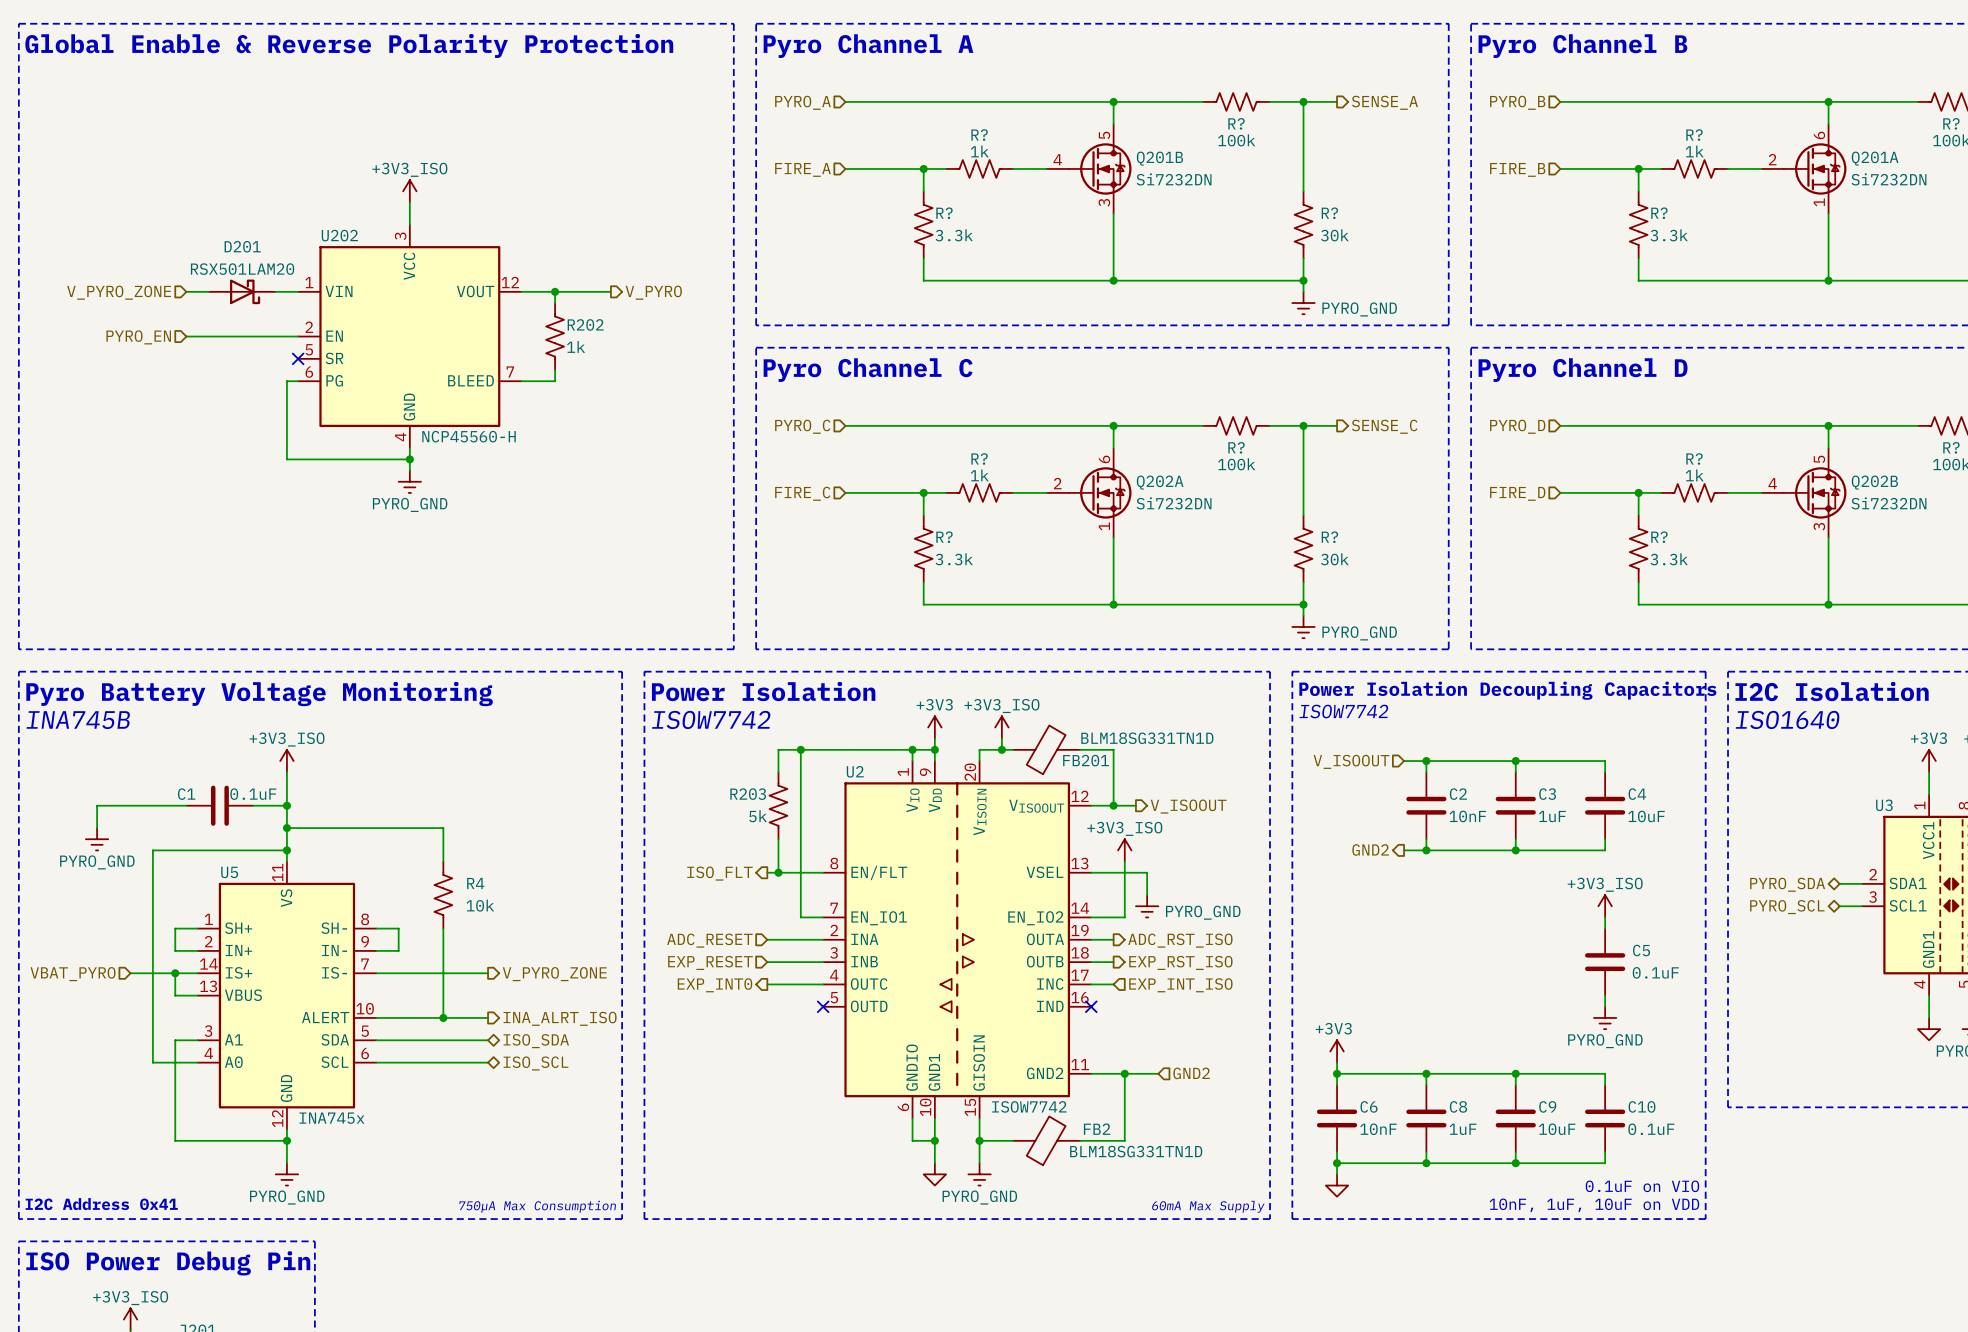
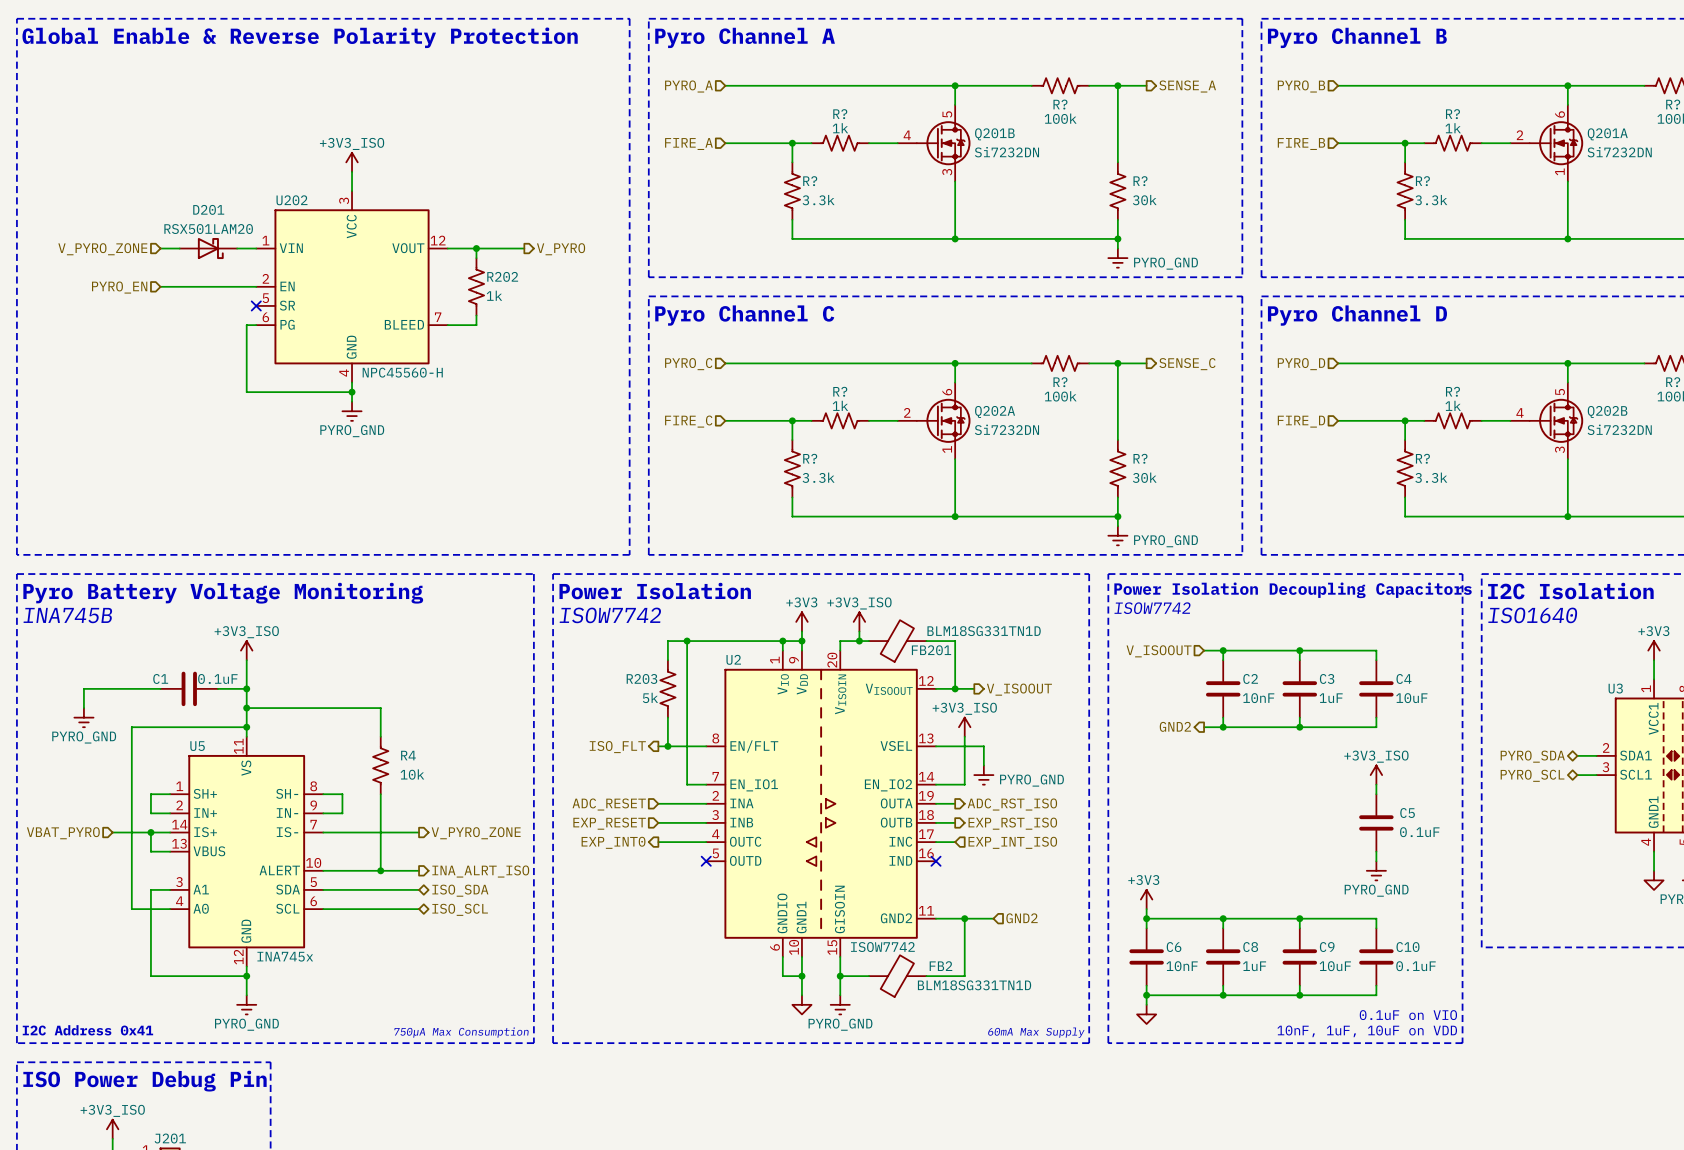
U202 value: NCP45560-H (469, 436) -> NPC45560-H (402, 372)

